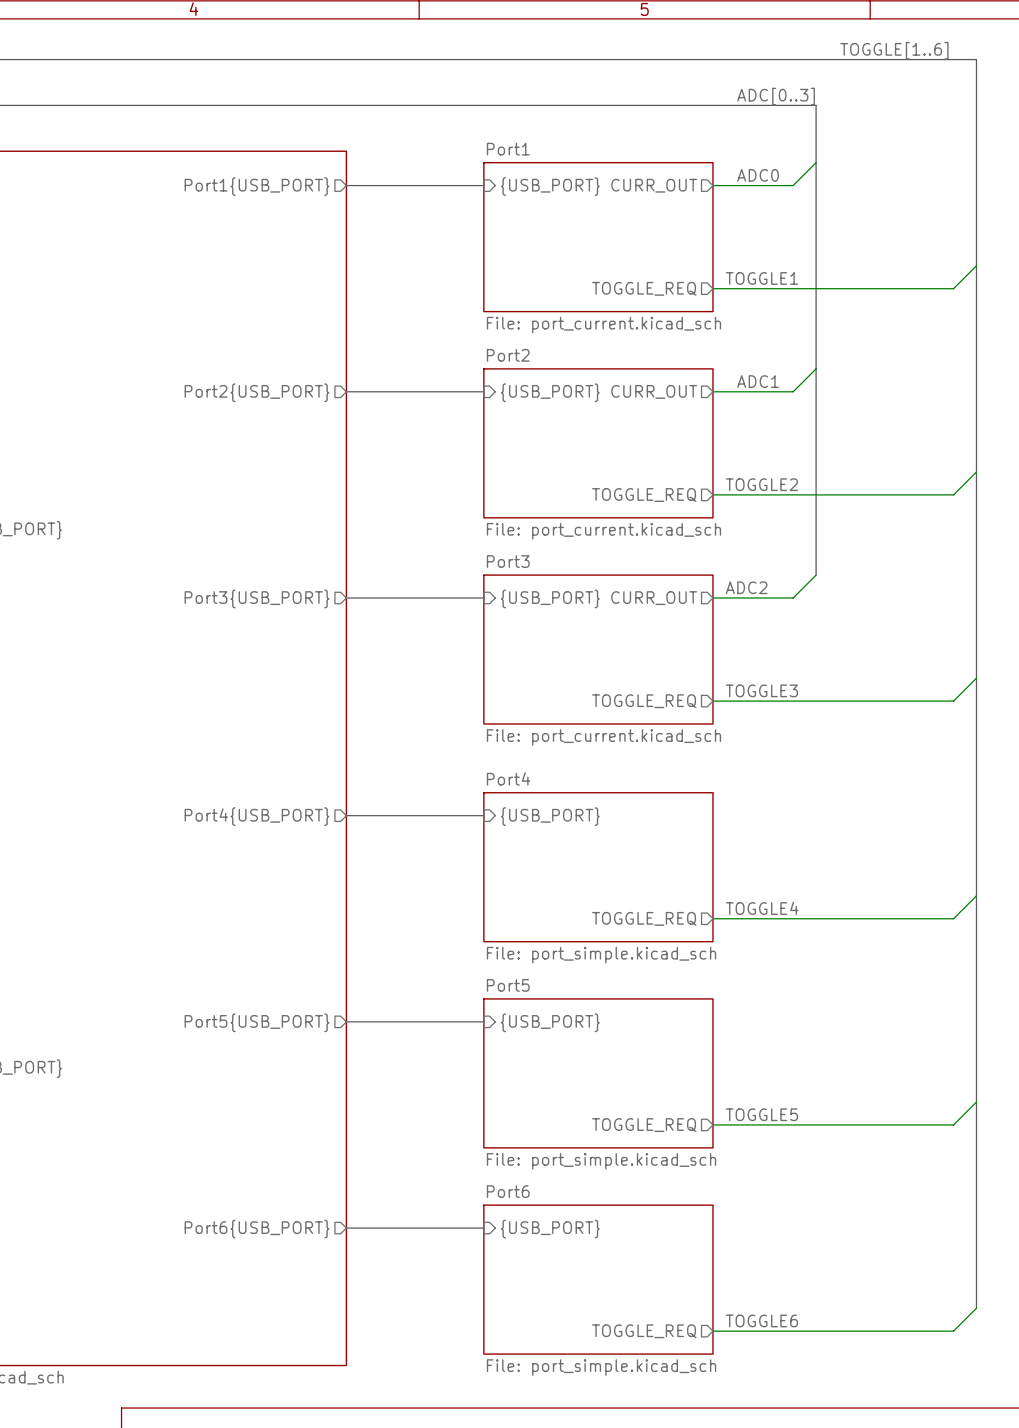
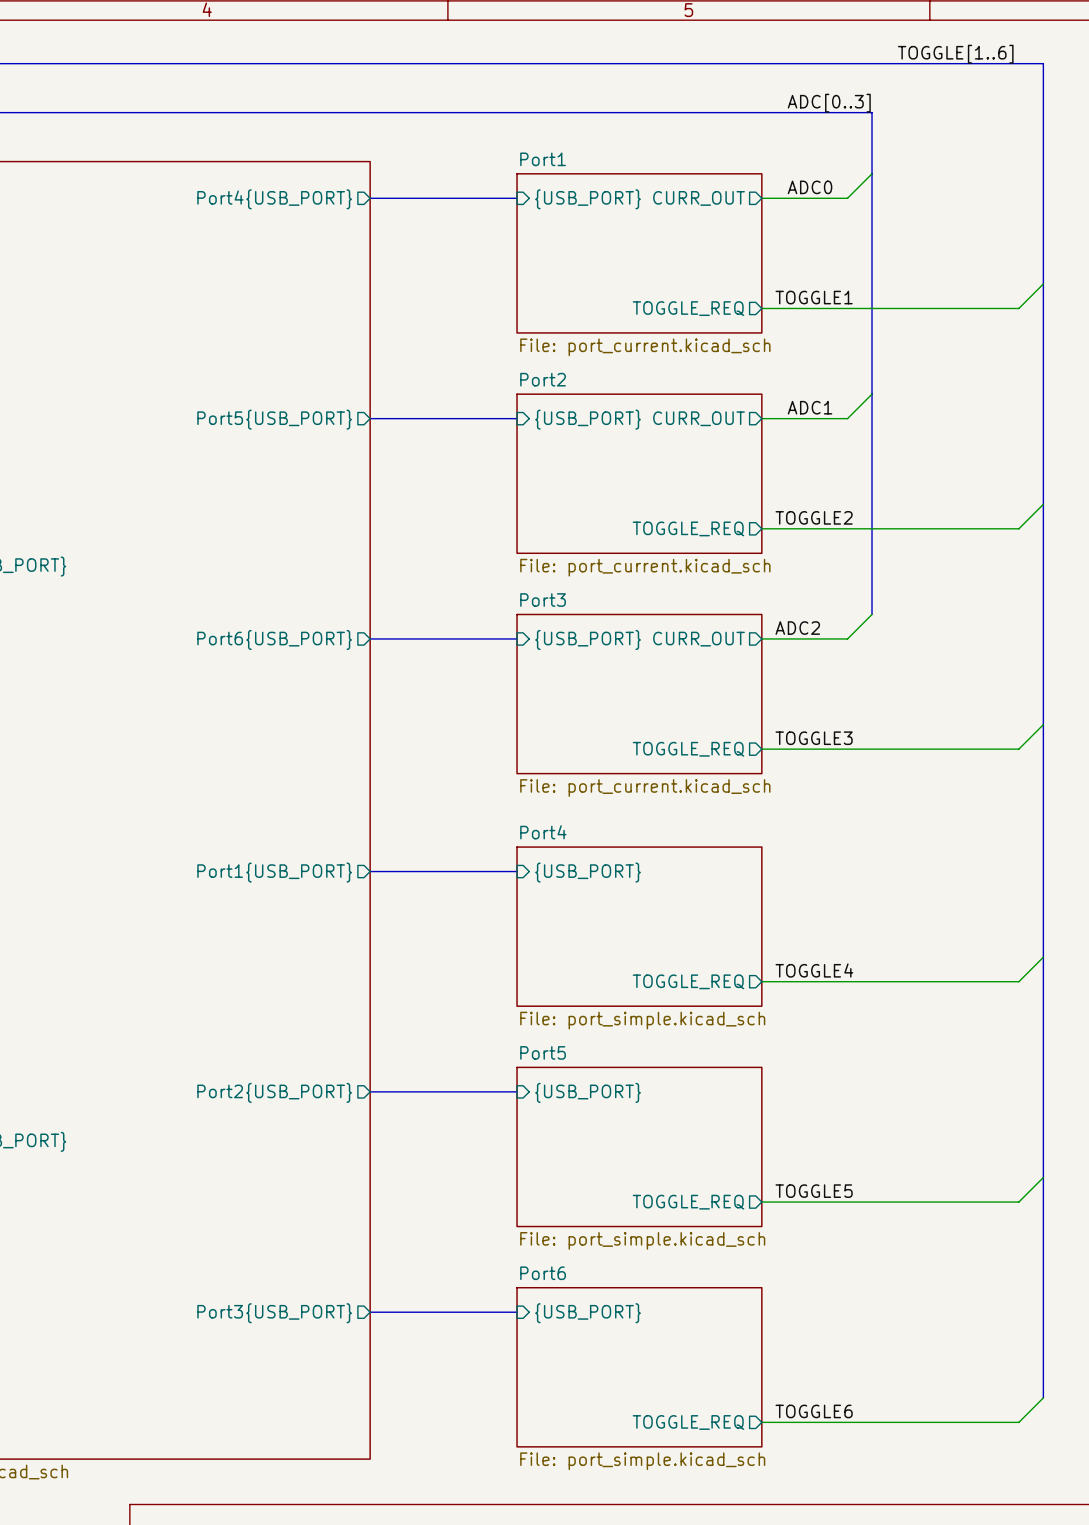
sheet pin: Port1{USB_PORT} (257, 186) -> Port4{USB_PORT} (274, 199)
sheet pin: Port2{USB_PORT} (257, 392) -> Port5{USB_PORT} (274, 419)
sheet pin: Port3{USB_PORT} (257, 598) -> Port6{USB_PORT} (274, 639)
sheet pin: Port4{USB_PORT} (257, 816) -> Port1{USB_PORT} (274, 872)
sheet pin: Port5{USB_PORT} (257, 1022) -> Port2{USB_PORT} (274, 1092)
sheet pin: Port6{USB_PORT} (257, 1229) -> Port3{USB_PORT} (274, 1313)

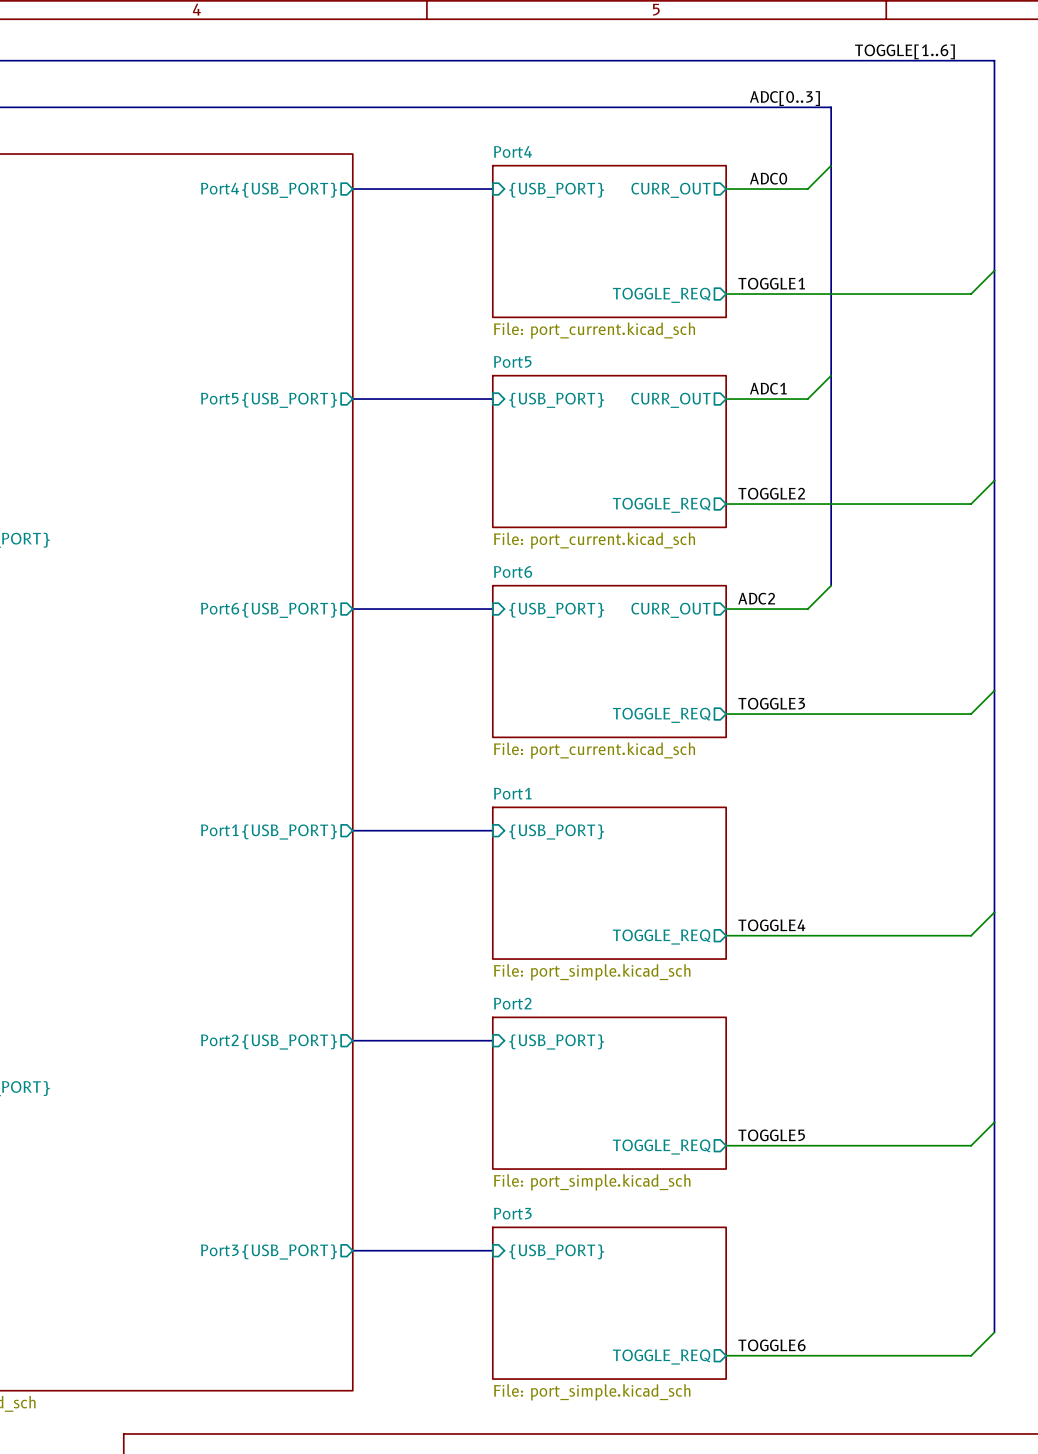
sheet Port1 name: Port1 (543, 159) -> Port4 (512, 151)
sheet Port2 name: Port2 (543, 379) -> Port5 (512, 361)
sheet Port3 name: Port3 (543, 600) -> Port6 (513, 571)
sheet Port4 name: Port4 (543, 832) -> Port1 (512, 793)
sheet Port5 name: Port5 (543, 1052) -> Port2 (512, 1003)
sheet Port6 name: Port6 (543, 1273) -> Port3 (512, 1213)

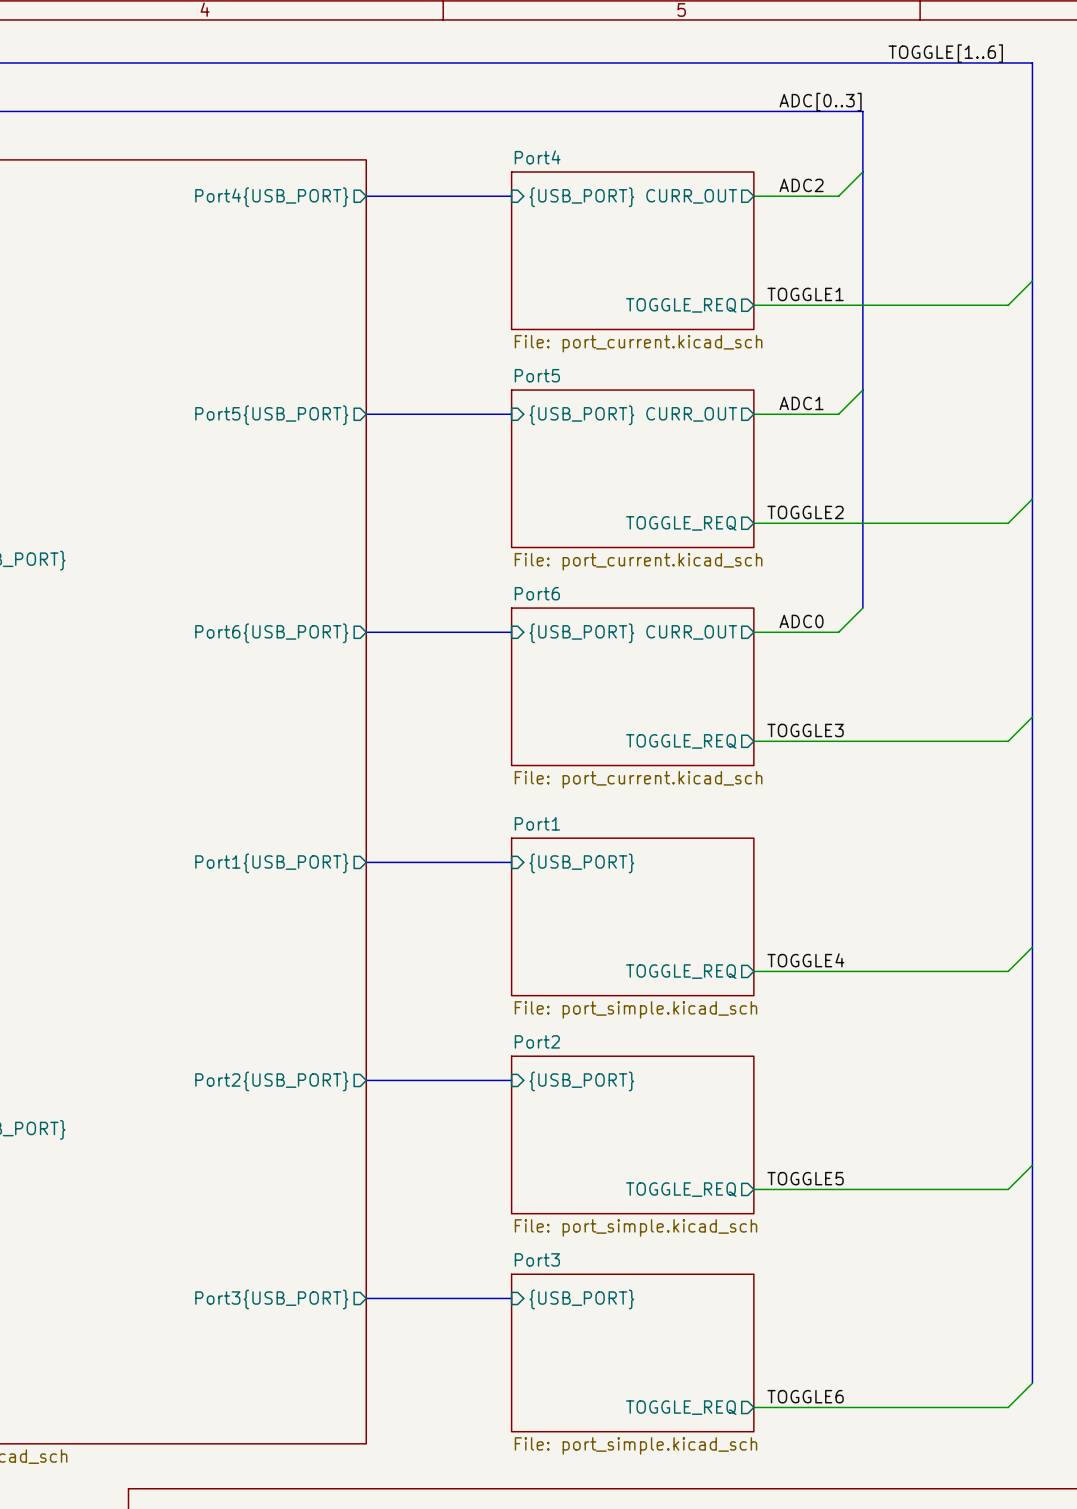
label: ADC0 (768, 178) -> ADC2 (801, 185)
label: ADC2 (756, 598) -> ADC0 (801, 621)

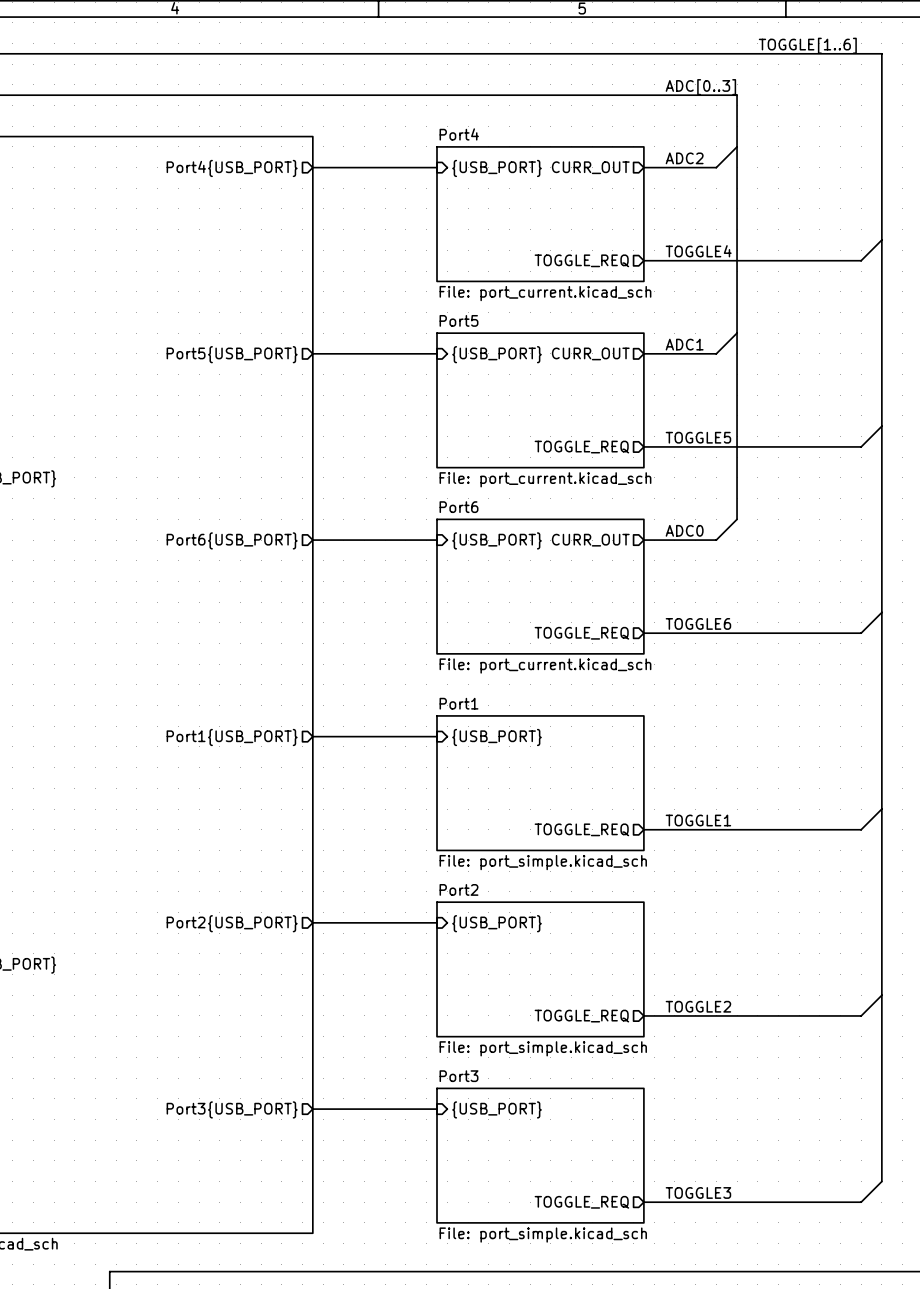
label: TOGGLE1 (805, 294) -> TOGGLE4 (698, 251)
label: TOGGLE2 (805, 512) -> TOGGLE5 (698, 437)
label: TOGGLE3 (805, 730) -> TOGGLE6 (698, 623)
label: TOGGLE4 (805, 960) -> TOGGLE1 (698, 820)
label: TOGGLE5 (805, 1178) -> TOGGLE2 (698, 1006)
label: TOGGLE6 (805, 1396) -> TOGGLE3 (698, 1192)

